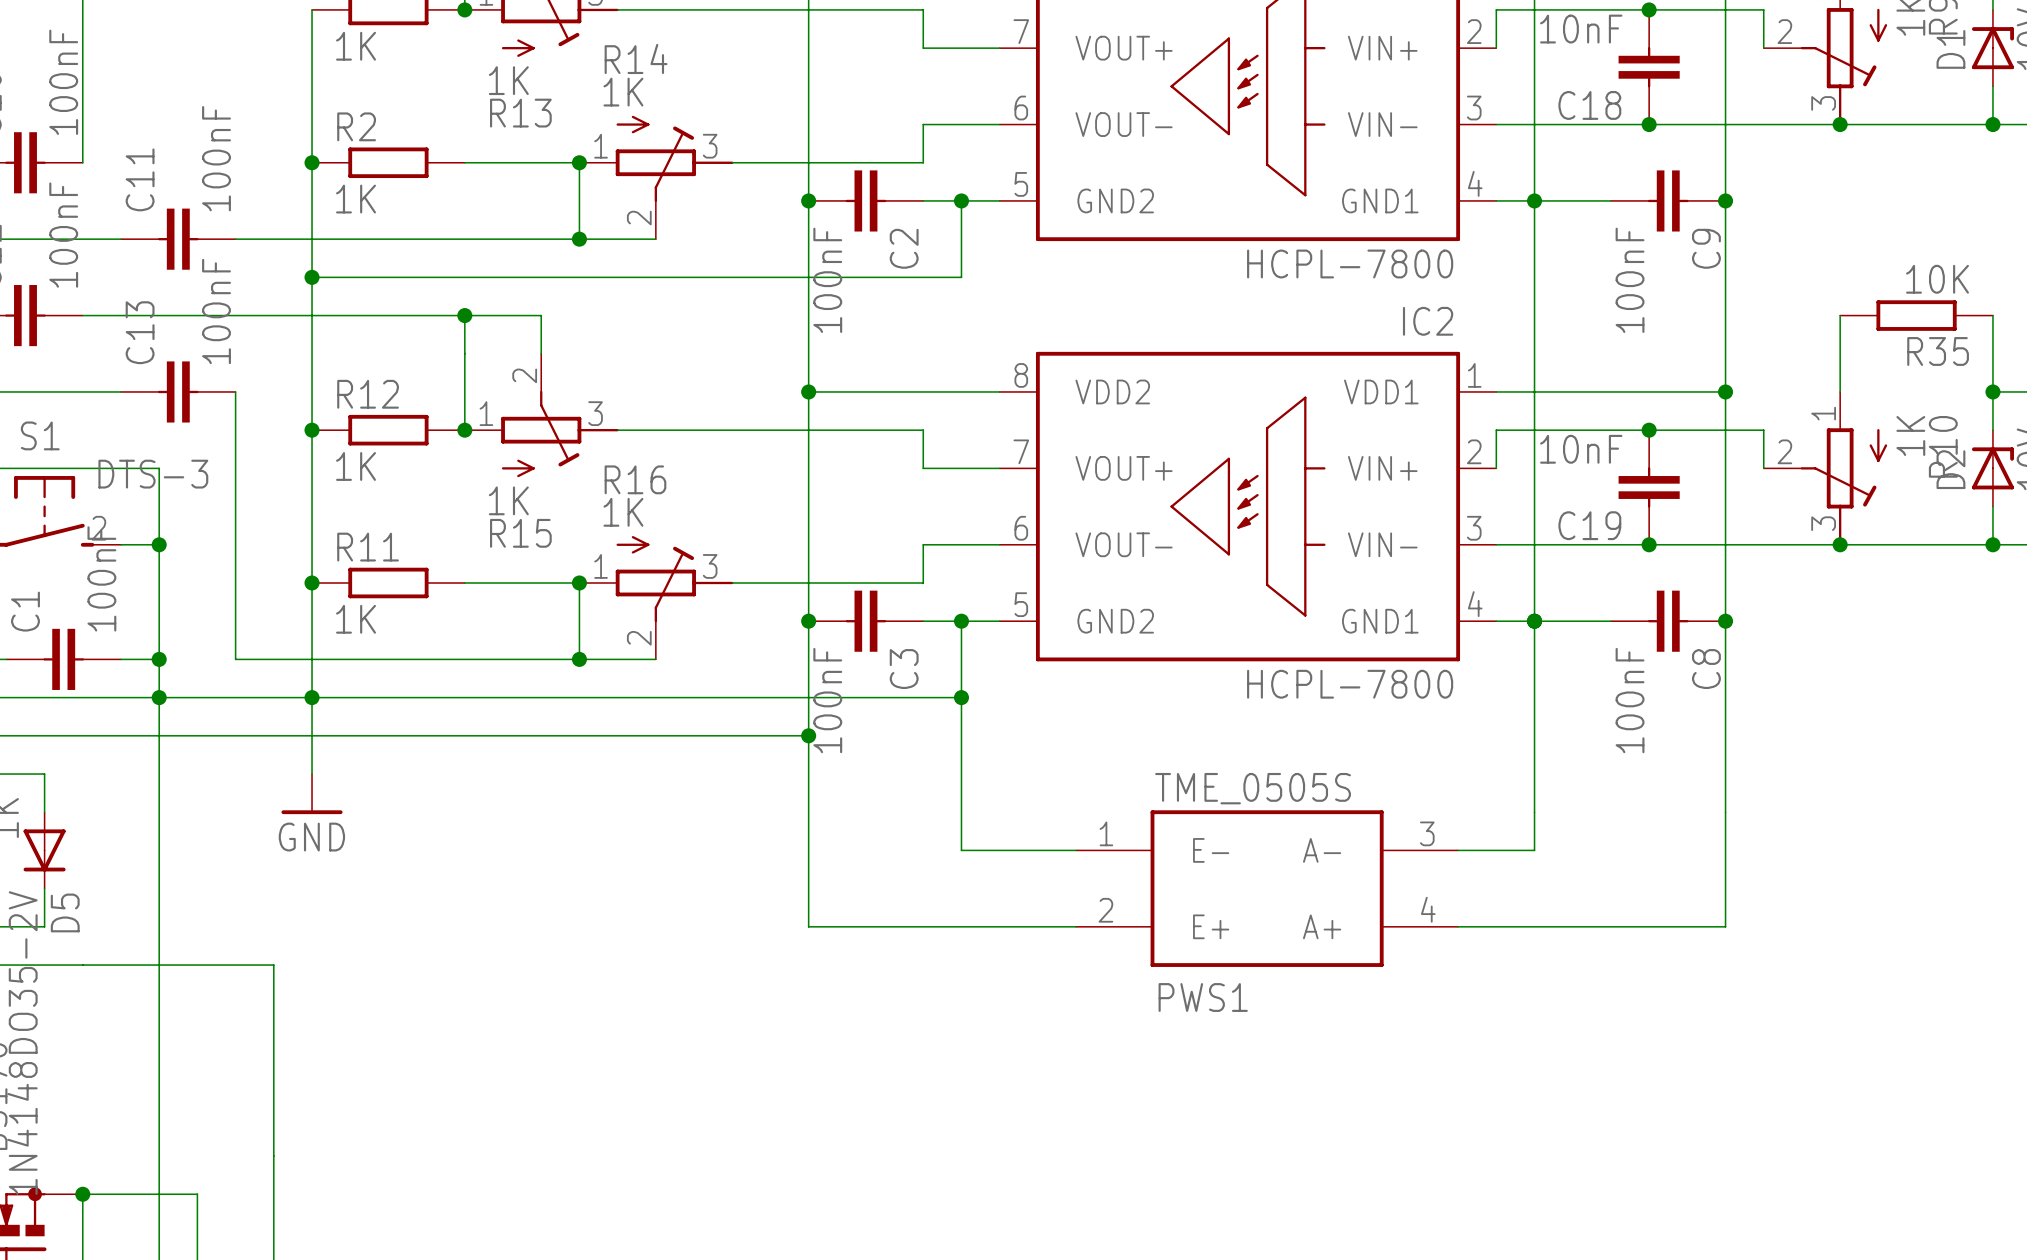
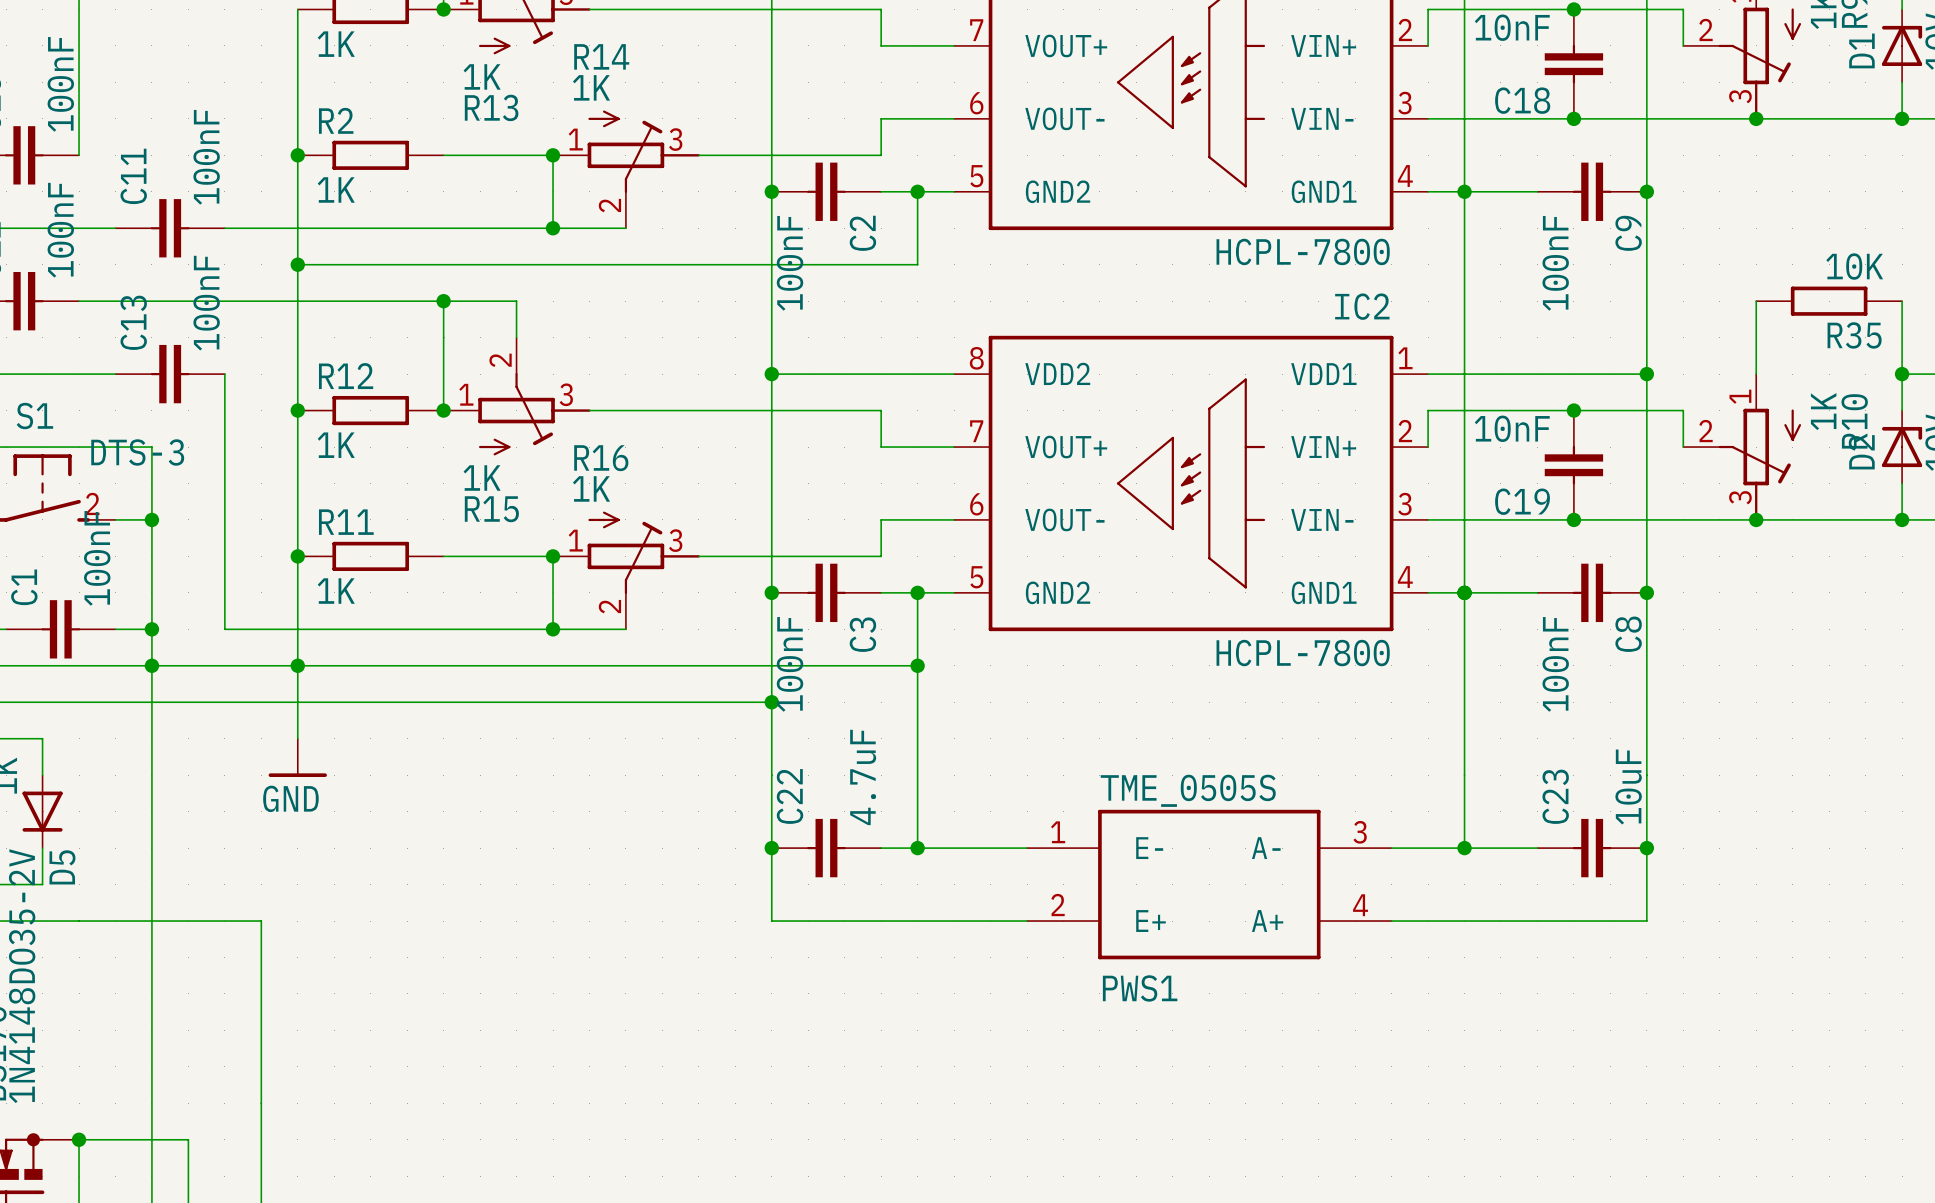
wire: (961, 850) (1076, 850) -> (917, 811) (917, 848)
wire: (1458, 850) (1534, 850) -> (1464, 848) (1464, 811)
junction: none -> (771, 848)
C22: none -> 4.7uF (826, 848)
wire: none -> (881, 848) (1027, 848)
junction: none -> (917, 848)
PWS1 position: (1267, 888) -> (1209, 884)
wire: none -> (1391, 848) (1537, 848)
junction: none -> (1464, 848)
C23: none -> 10uF (1592, 848)
junction: none -> (1646, 848)
wire: (808, 926) (1076, 926) -> (771, 884) (771, 921) (1027, 921)
wire: (1458, 926) (1725, 926) -> (1391, 921) (1646, 921) (1646, 884)

